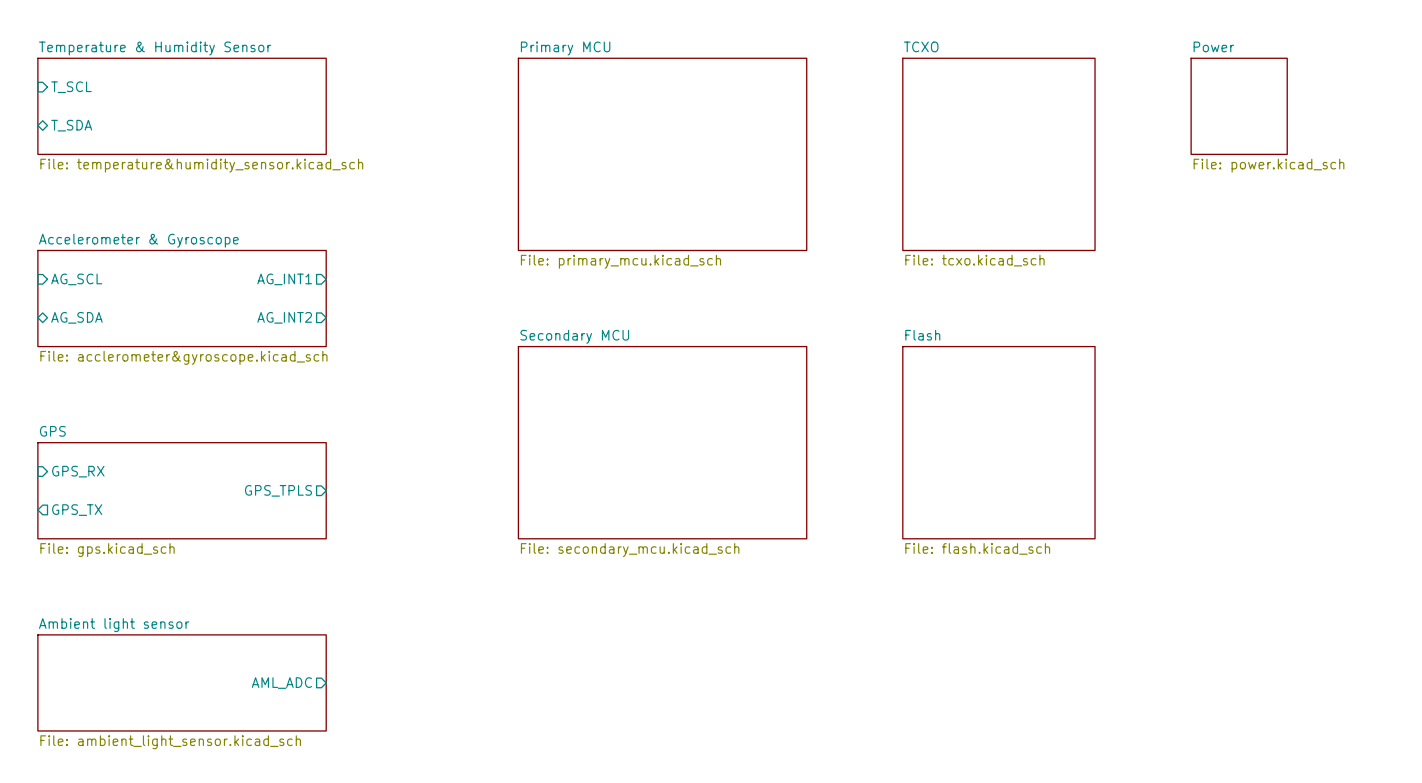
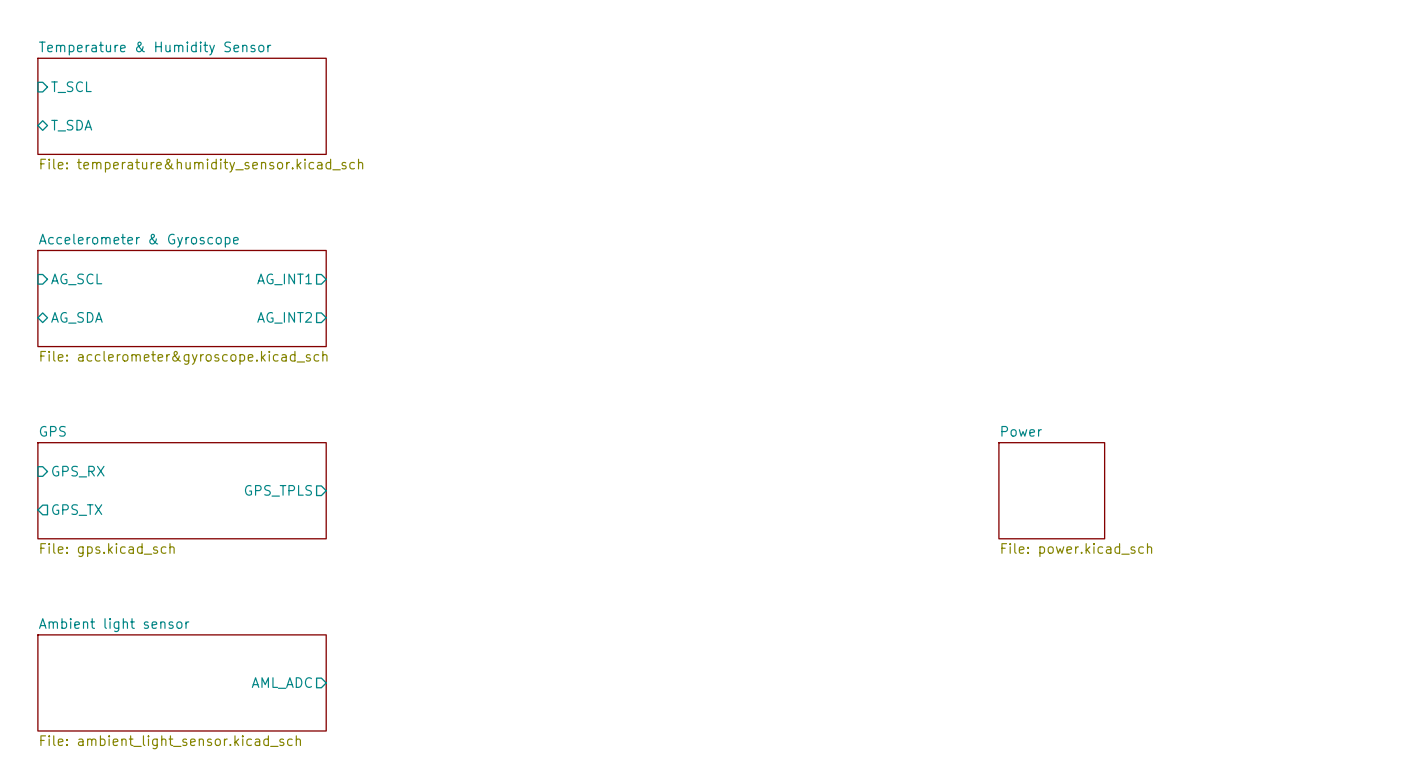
sheet Power: File: power.kicad_sch (1239, 106) -> none
sheet Primary MCU: File: primary_mcu.kicad_sch (662, 154) -> none
sheet TCXO: File: tcxo.kicad_sch (998, 154) -> none
sheet Secondary MCU: File: secondary_mcu.kicad_sch (662, 442) -> none
sheet Flash: File: flash.kicad_sch (998, 442) -> none
sheet Power: none -> File: power.kicad_sch (1051, 490)

